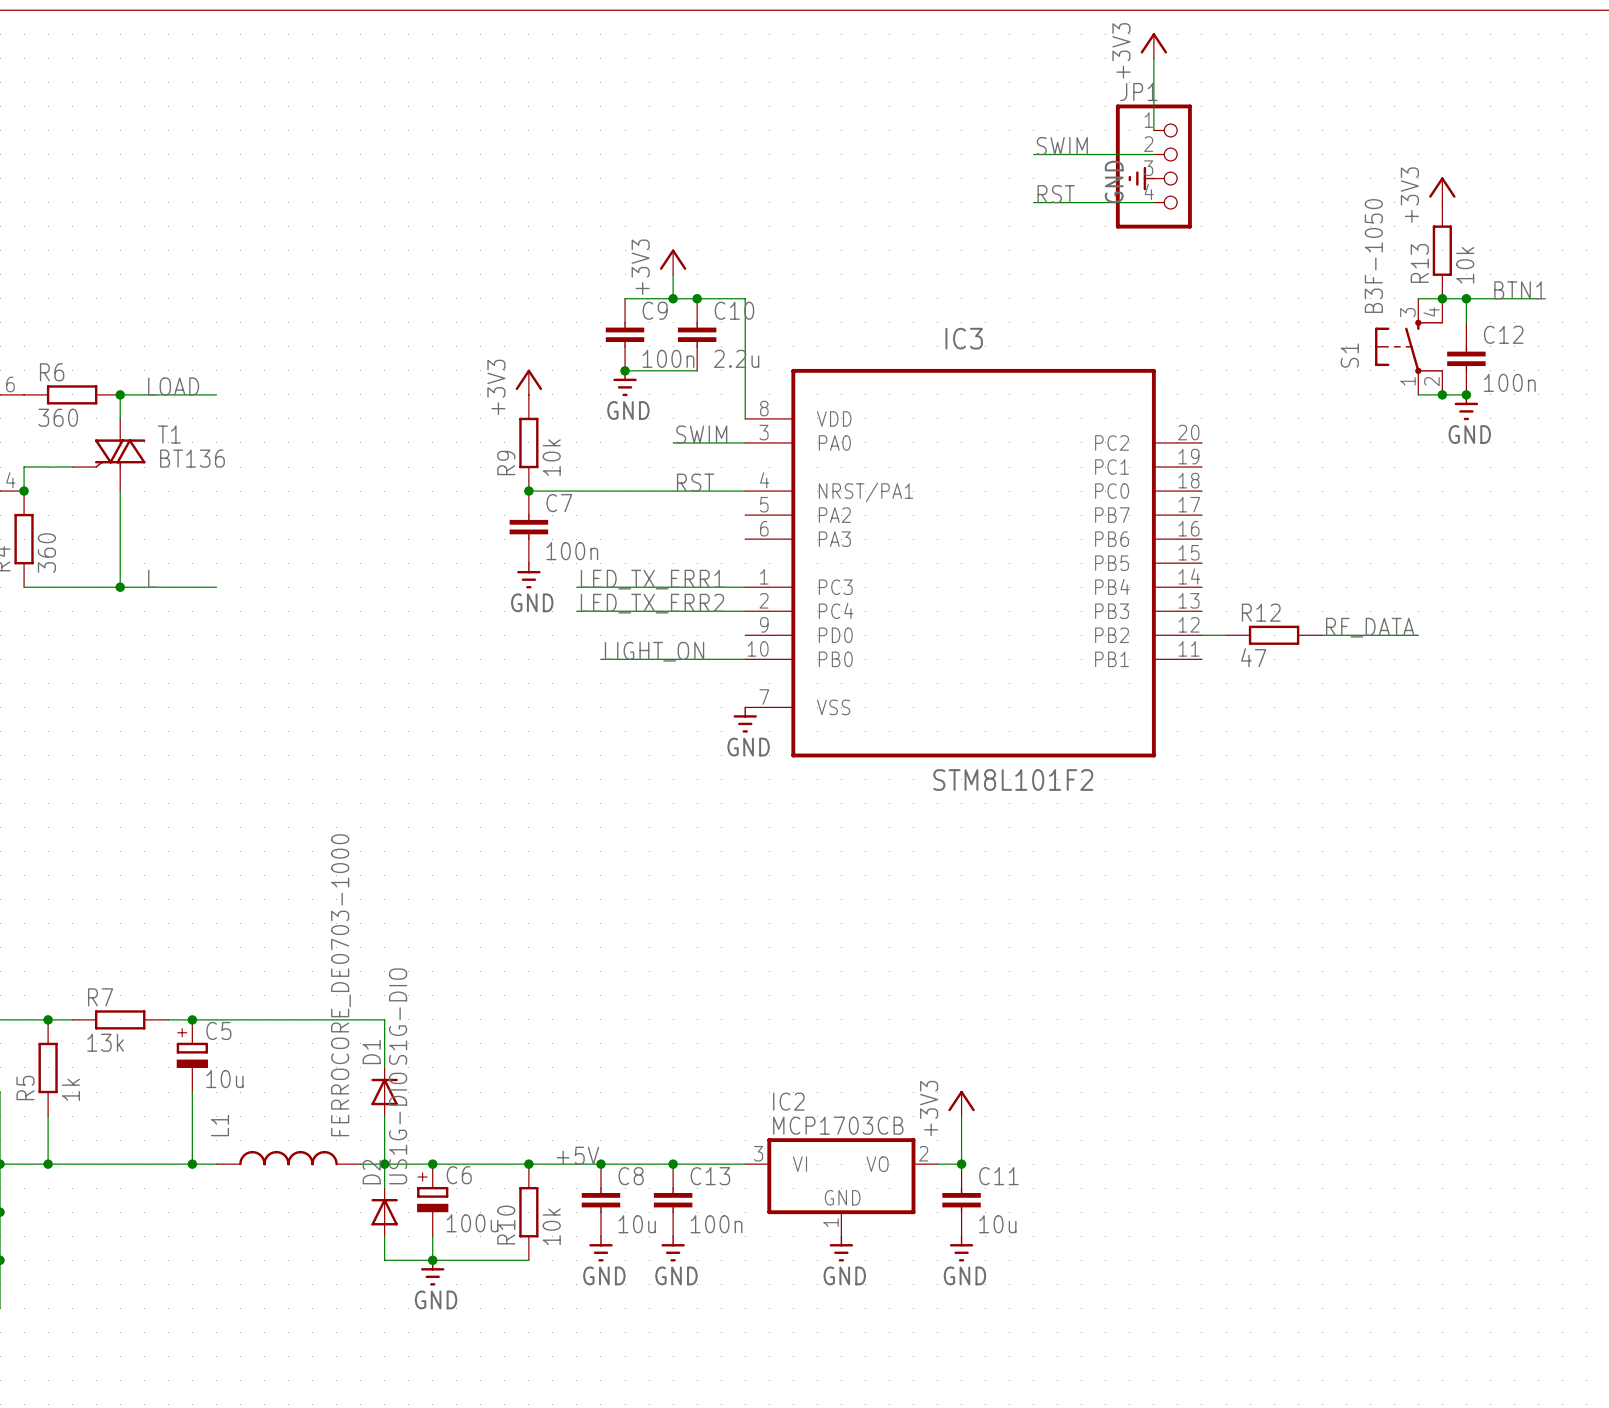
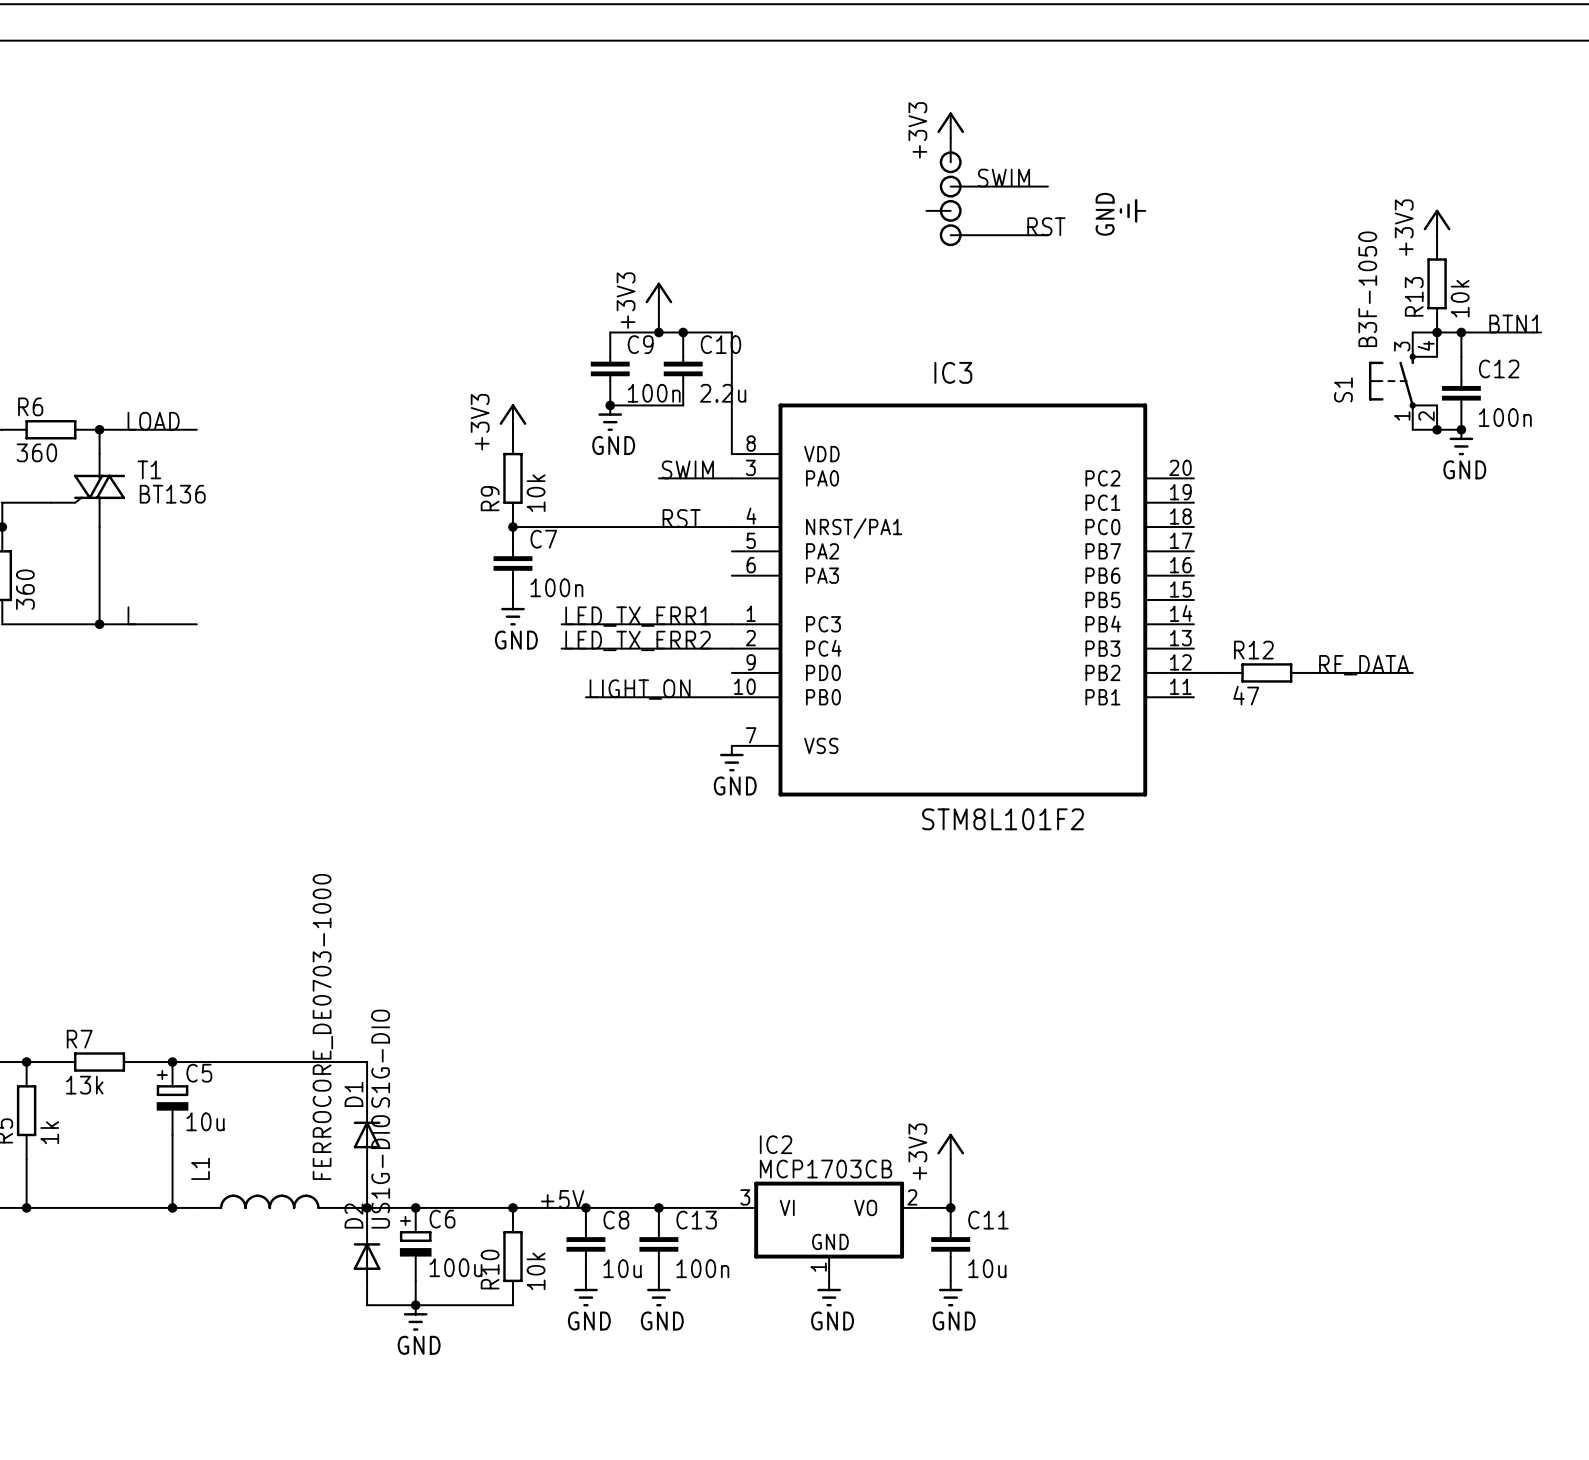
power symbol position: +3V3 (1153, 45) -> +3V3 (950, 125)
wire: (1153, 58) (1153, 130) -> none
wire: none -> (950, 137) (950, 162)
part: none -> (950, 162)
label position: SWIM (1062, 146) -> SWIM (1004, 178)
wire: none -> (950, 186) (1023, 186)
part: none -> (950, 186)
wire: (1057, 154) (1153, 154) -> none
JP1: (1153, 166) -> none
wire: none -> (926, 210) (950, 210)
part: none -> (950, 210)
wire: none -> (950, 235) (1023, 235)
part: none -> (950, 235)
wire: (1057, 202) (1153, 202) -> none

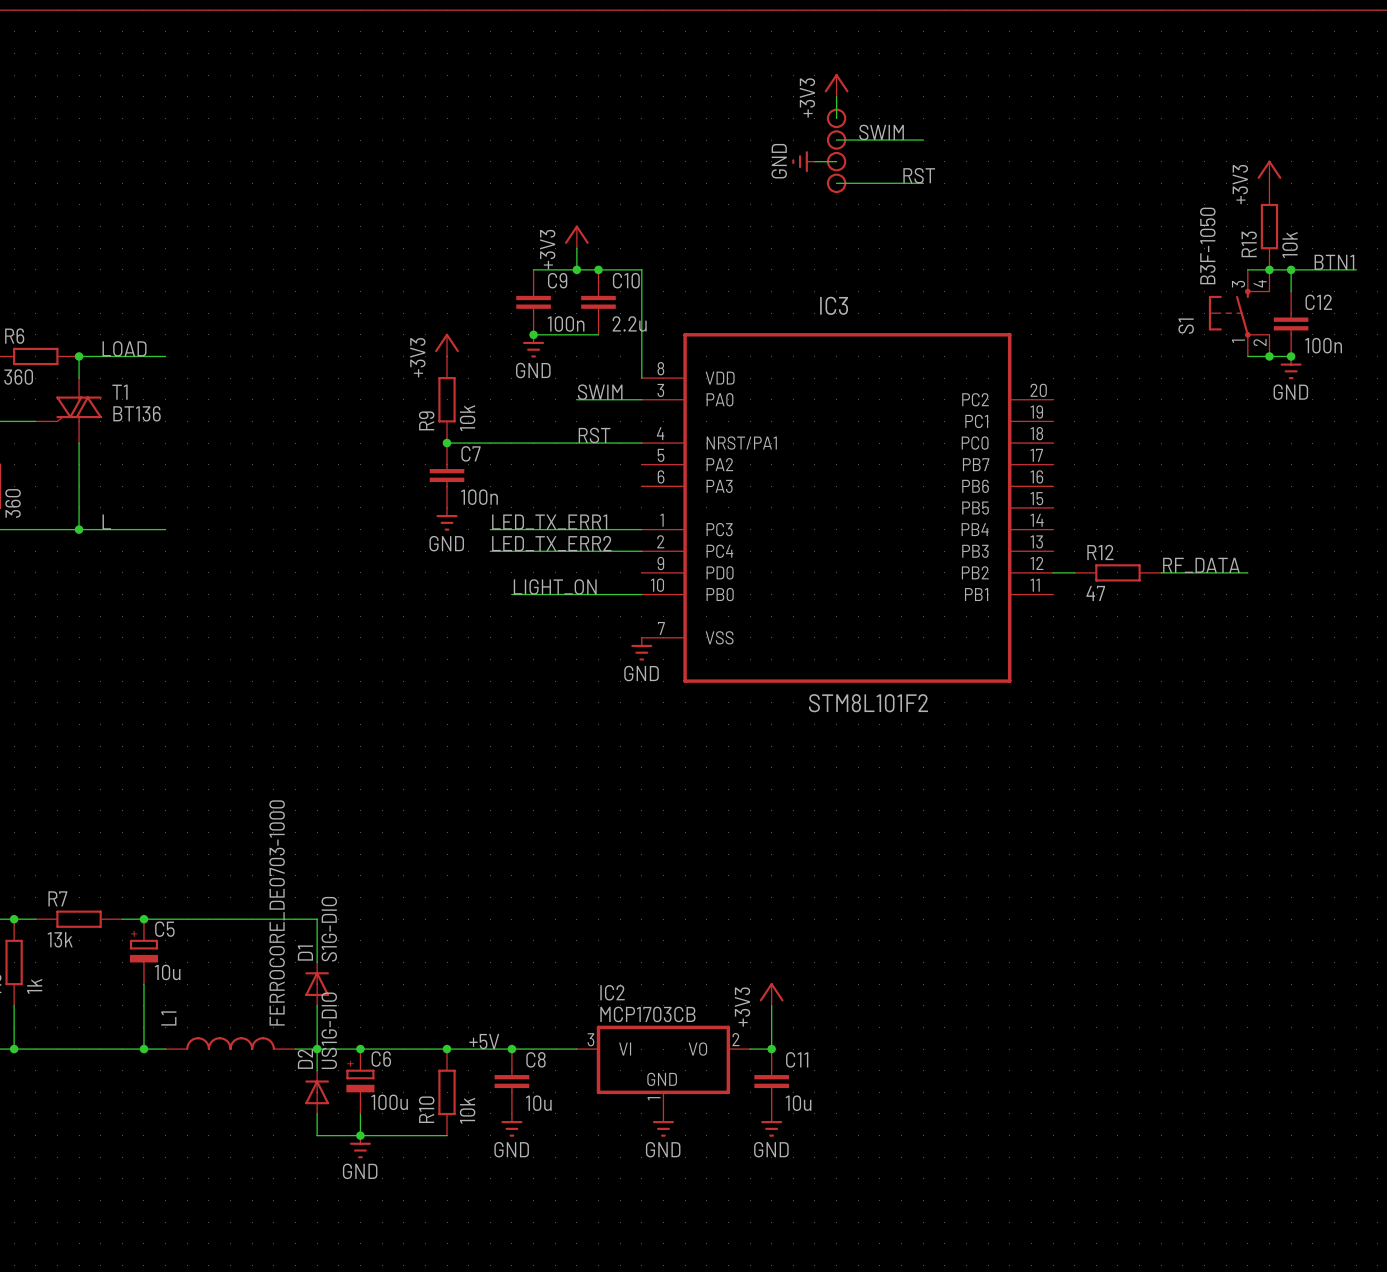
power symbol position: GND (1132, 210) -> GND (803, 161)
power symbol position: +3V3 (950, 1146) -> +3V3 (771, 994)
wire: (950, 1159) (950, 1207) (926, 1207) -> (771, 1005) (771, 1049) (750, 1049)
wire: (658, 1207) (731, 1207) -> none
junction: (658, 1207) -> none
junction: none -> (771, 1049)
junction: (950, 1207) -> none
IC2 position: (829, 1231) -> (663, 1069)
C13: 100n (658, 1244) -> none
C11 position: (950, 1244) -> (771, 1081)
power symbol: GND (658, 1293) -> none
power symbol: none -> GND (663, 1125)
power symbol: GND (829, 1293) -> none
power symbol: none -> GND (771, 1125)
power symbol: GND (950, 1293) -> none

